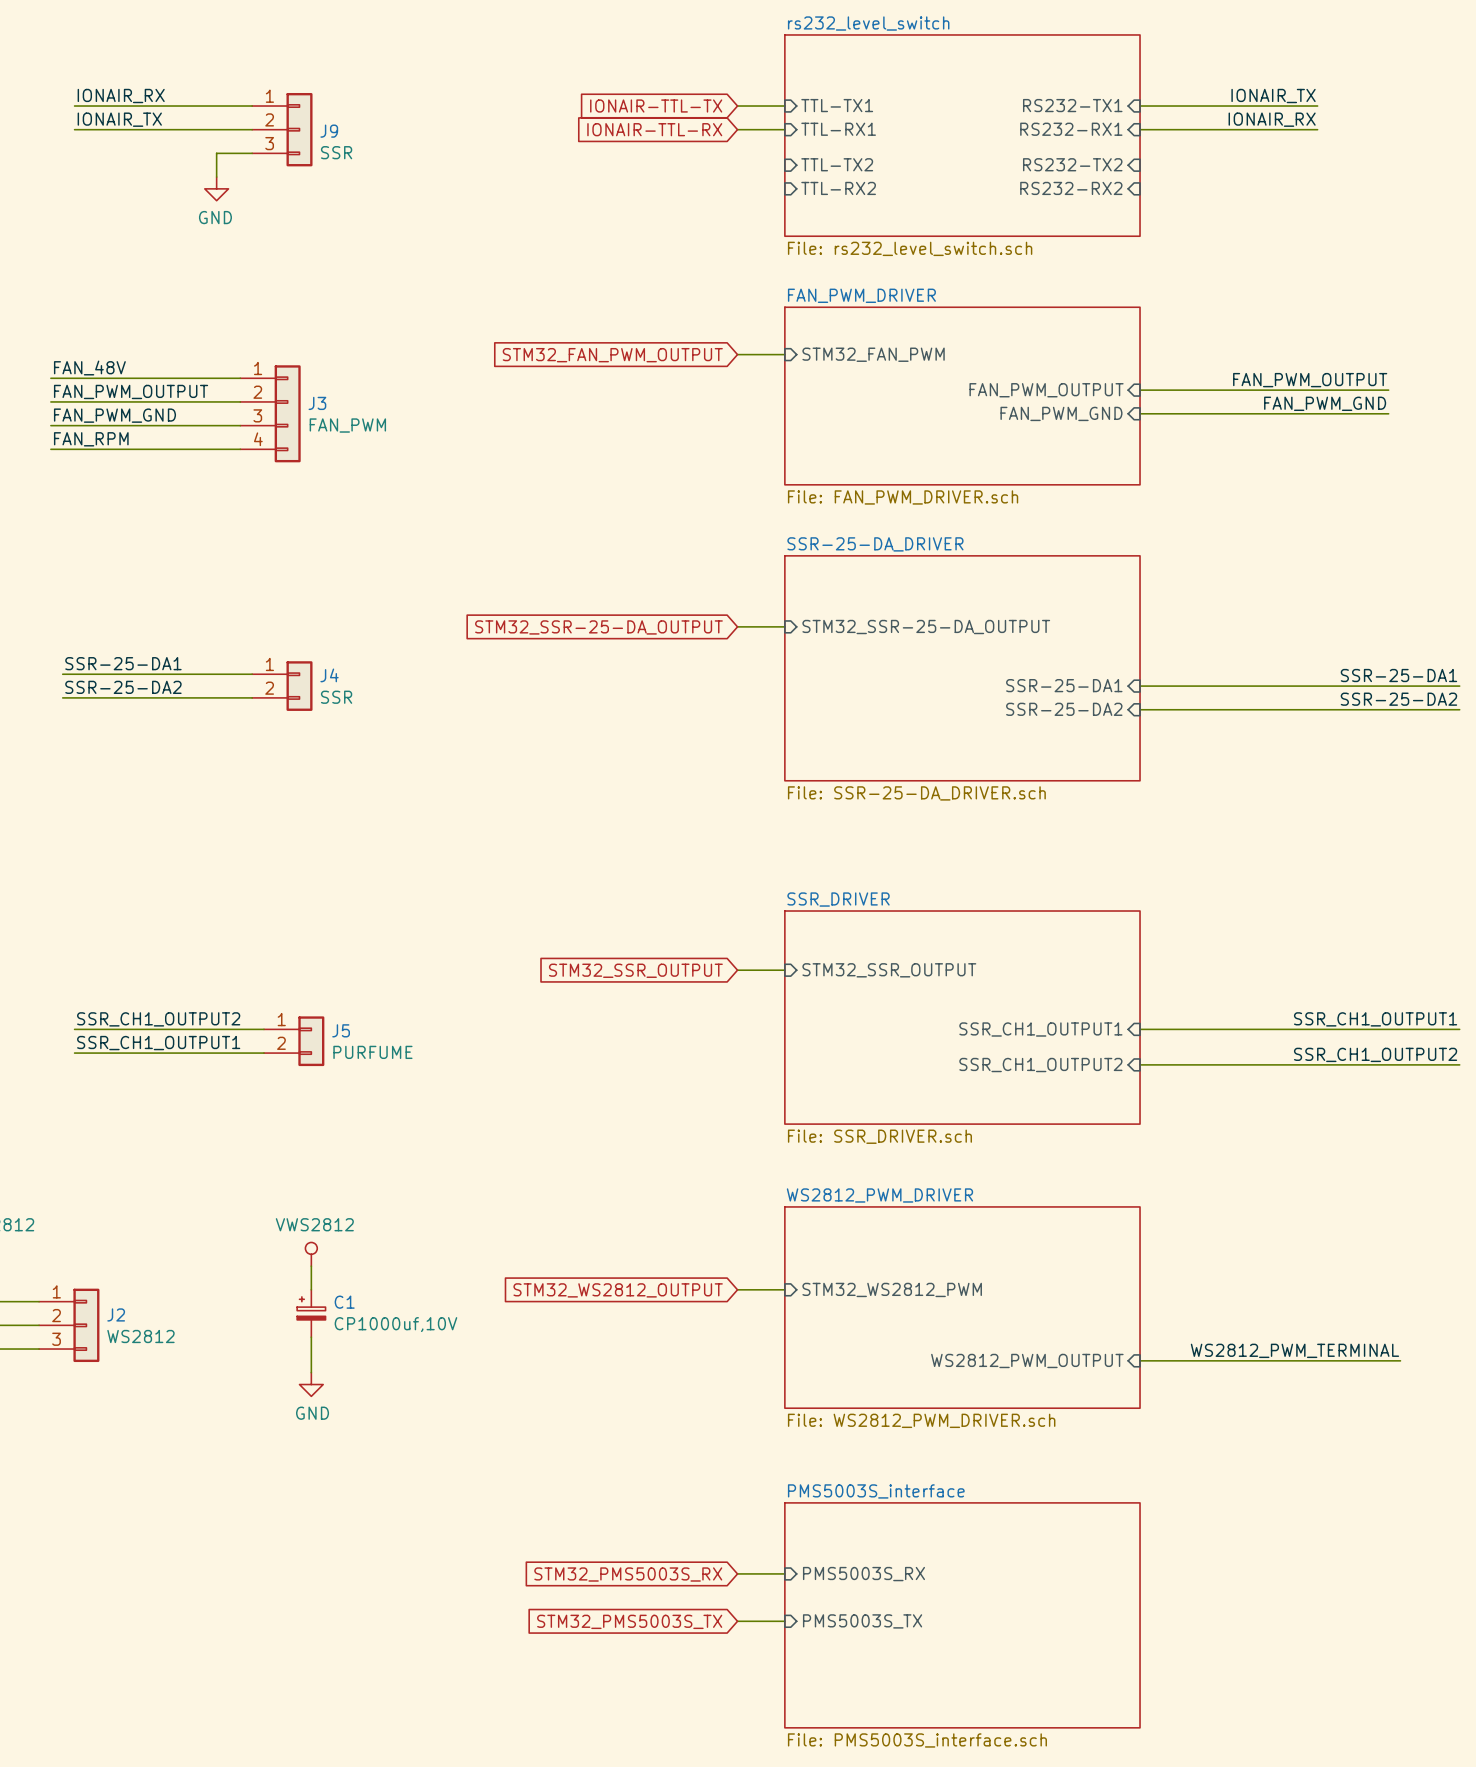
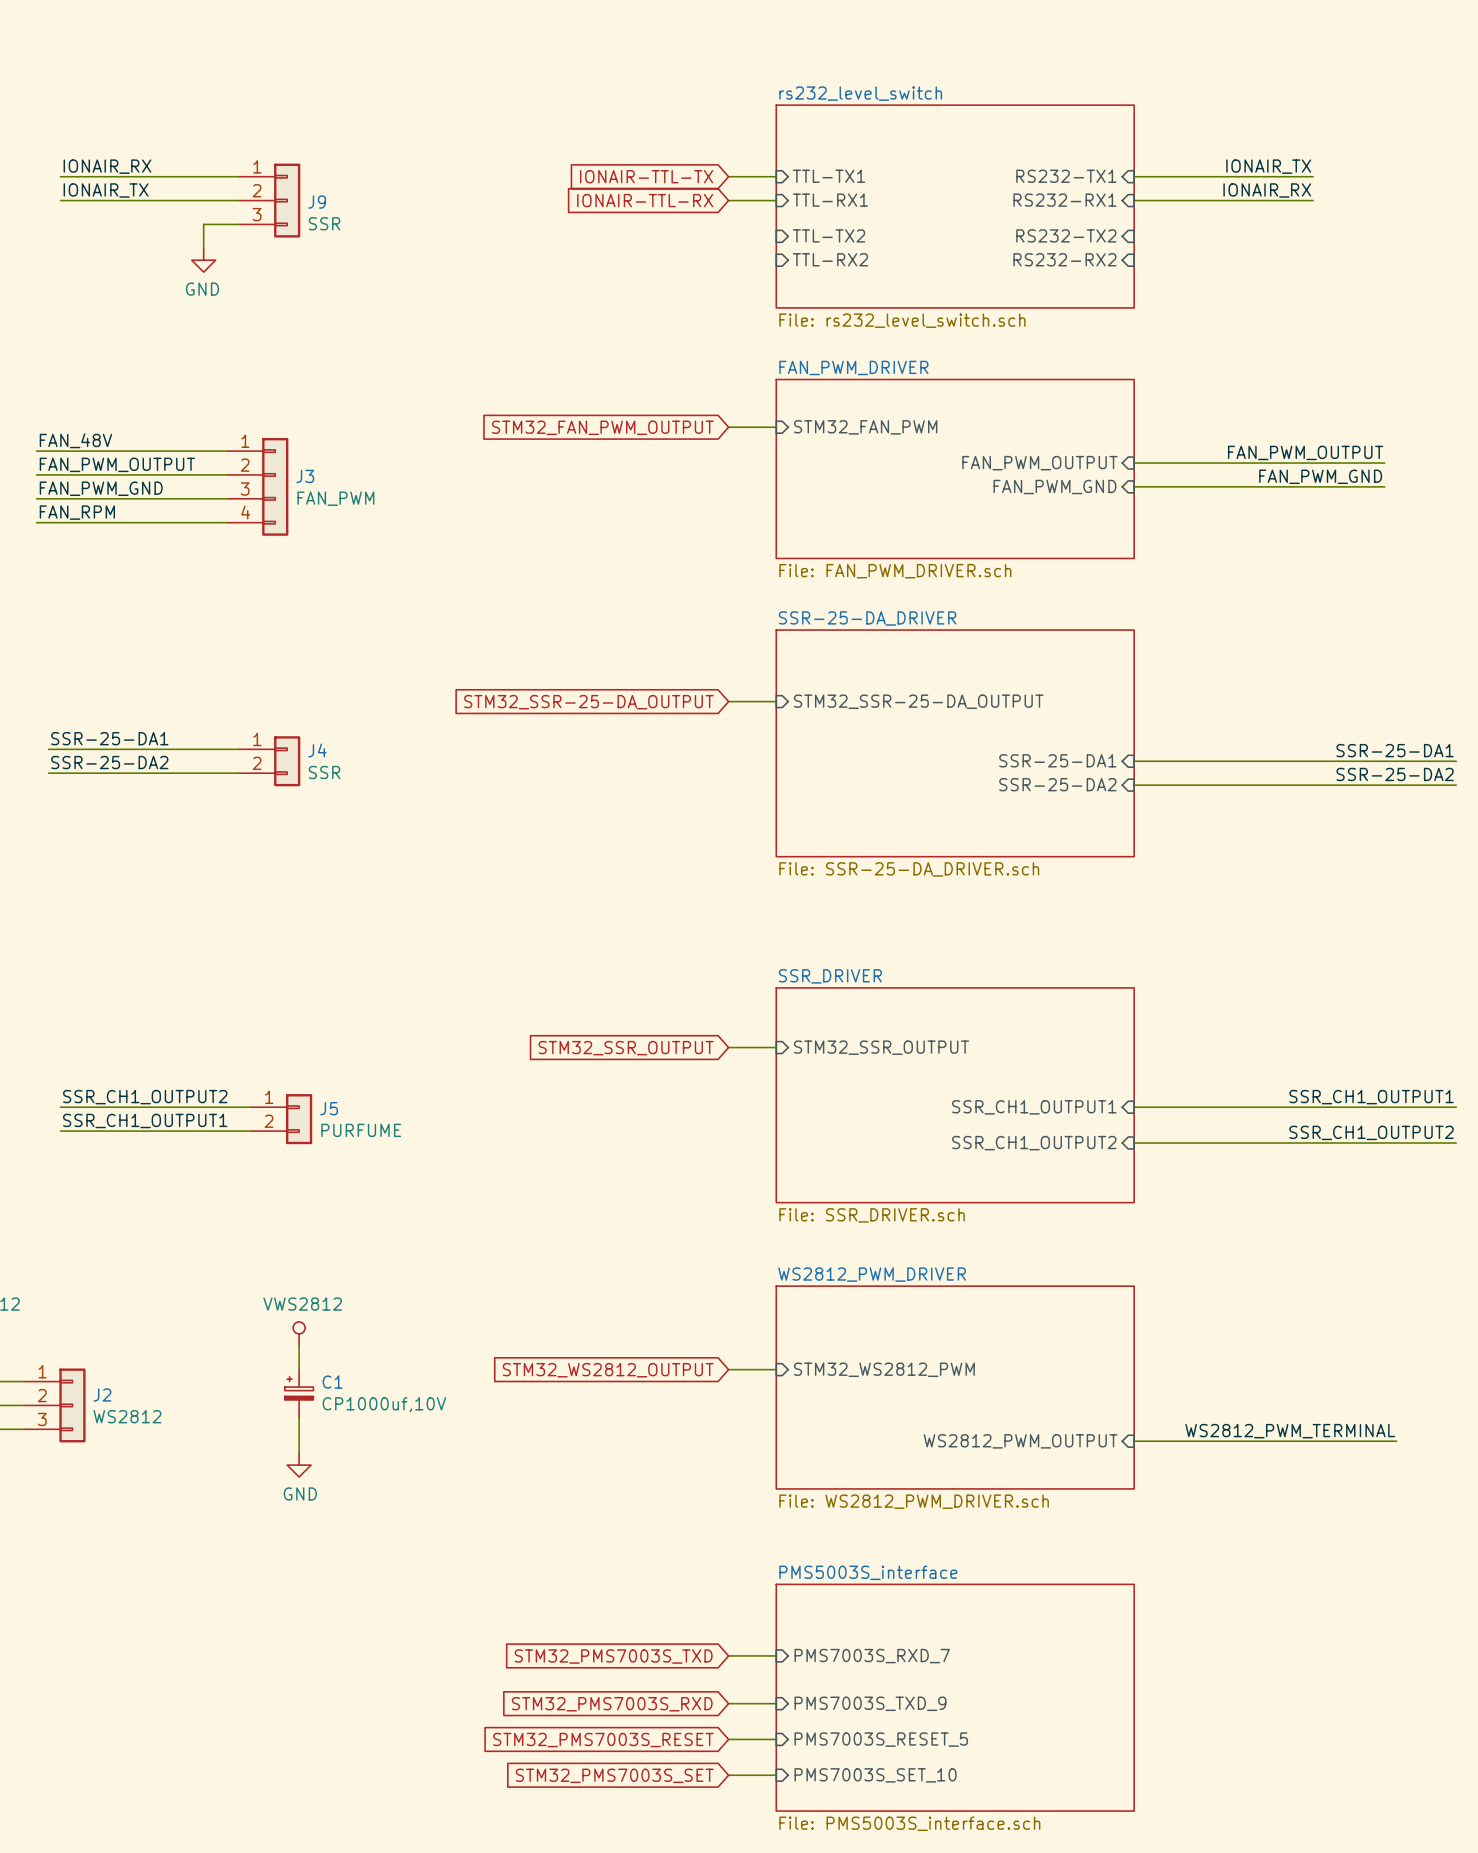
global label: STM32_PMS5003S_RX (628, 1574) -> STM32_PMS7003S_TXD (613, 1656)
sheet pin: PMS5003S_RX (863, 1574) -> PMS7003S_RXD_7 (872, 1656)
global label: STM32_PMS5003S_TX (629, 1621) -> STM32_PMS7003S_RXD (612, 1704)
sheet pin: PMS5003S_TX (862, 1621) -> PMS7003S_TXD_9 (870, 1703)
wire: none -> (728, 1739) (776, 1739)
sheet pin: none -> PMS7003S_RESET_5 (881, 1739)
global label: none -> STM32_PMS7003S_RESET (603, 1740)
global label: none -> STM32_PMS7003S_SET (614, 1775)
wire: none -> (728, 1775) (776, 1775)
sheet pin: none -> PMS7003S_SET_10 (875, 1775)

